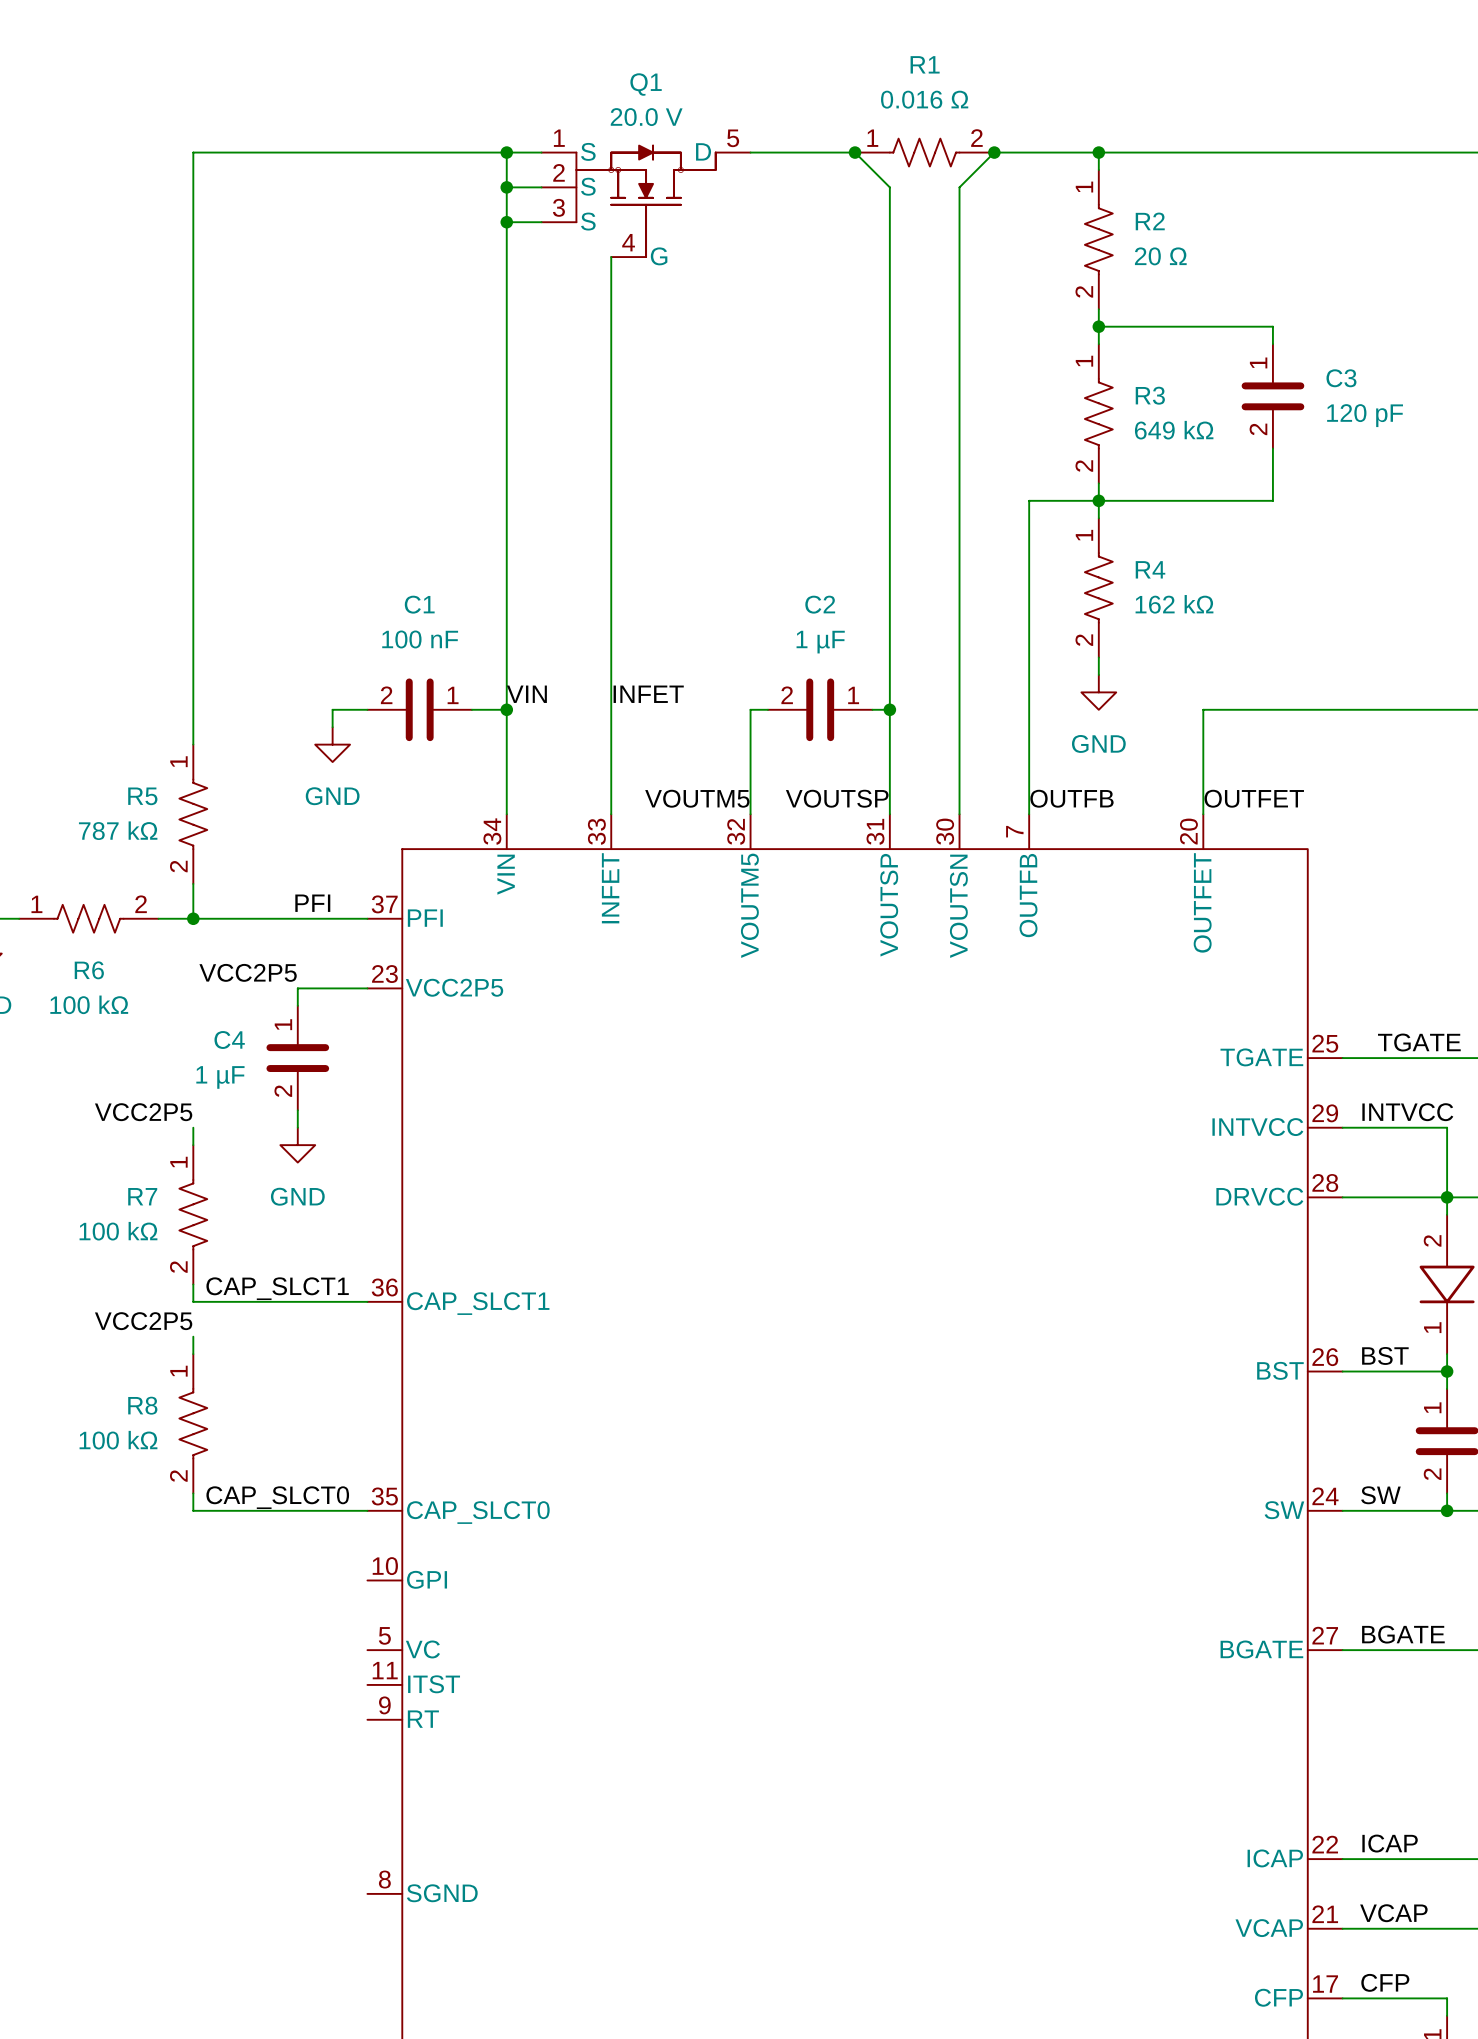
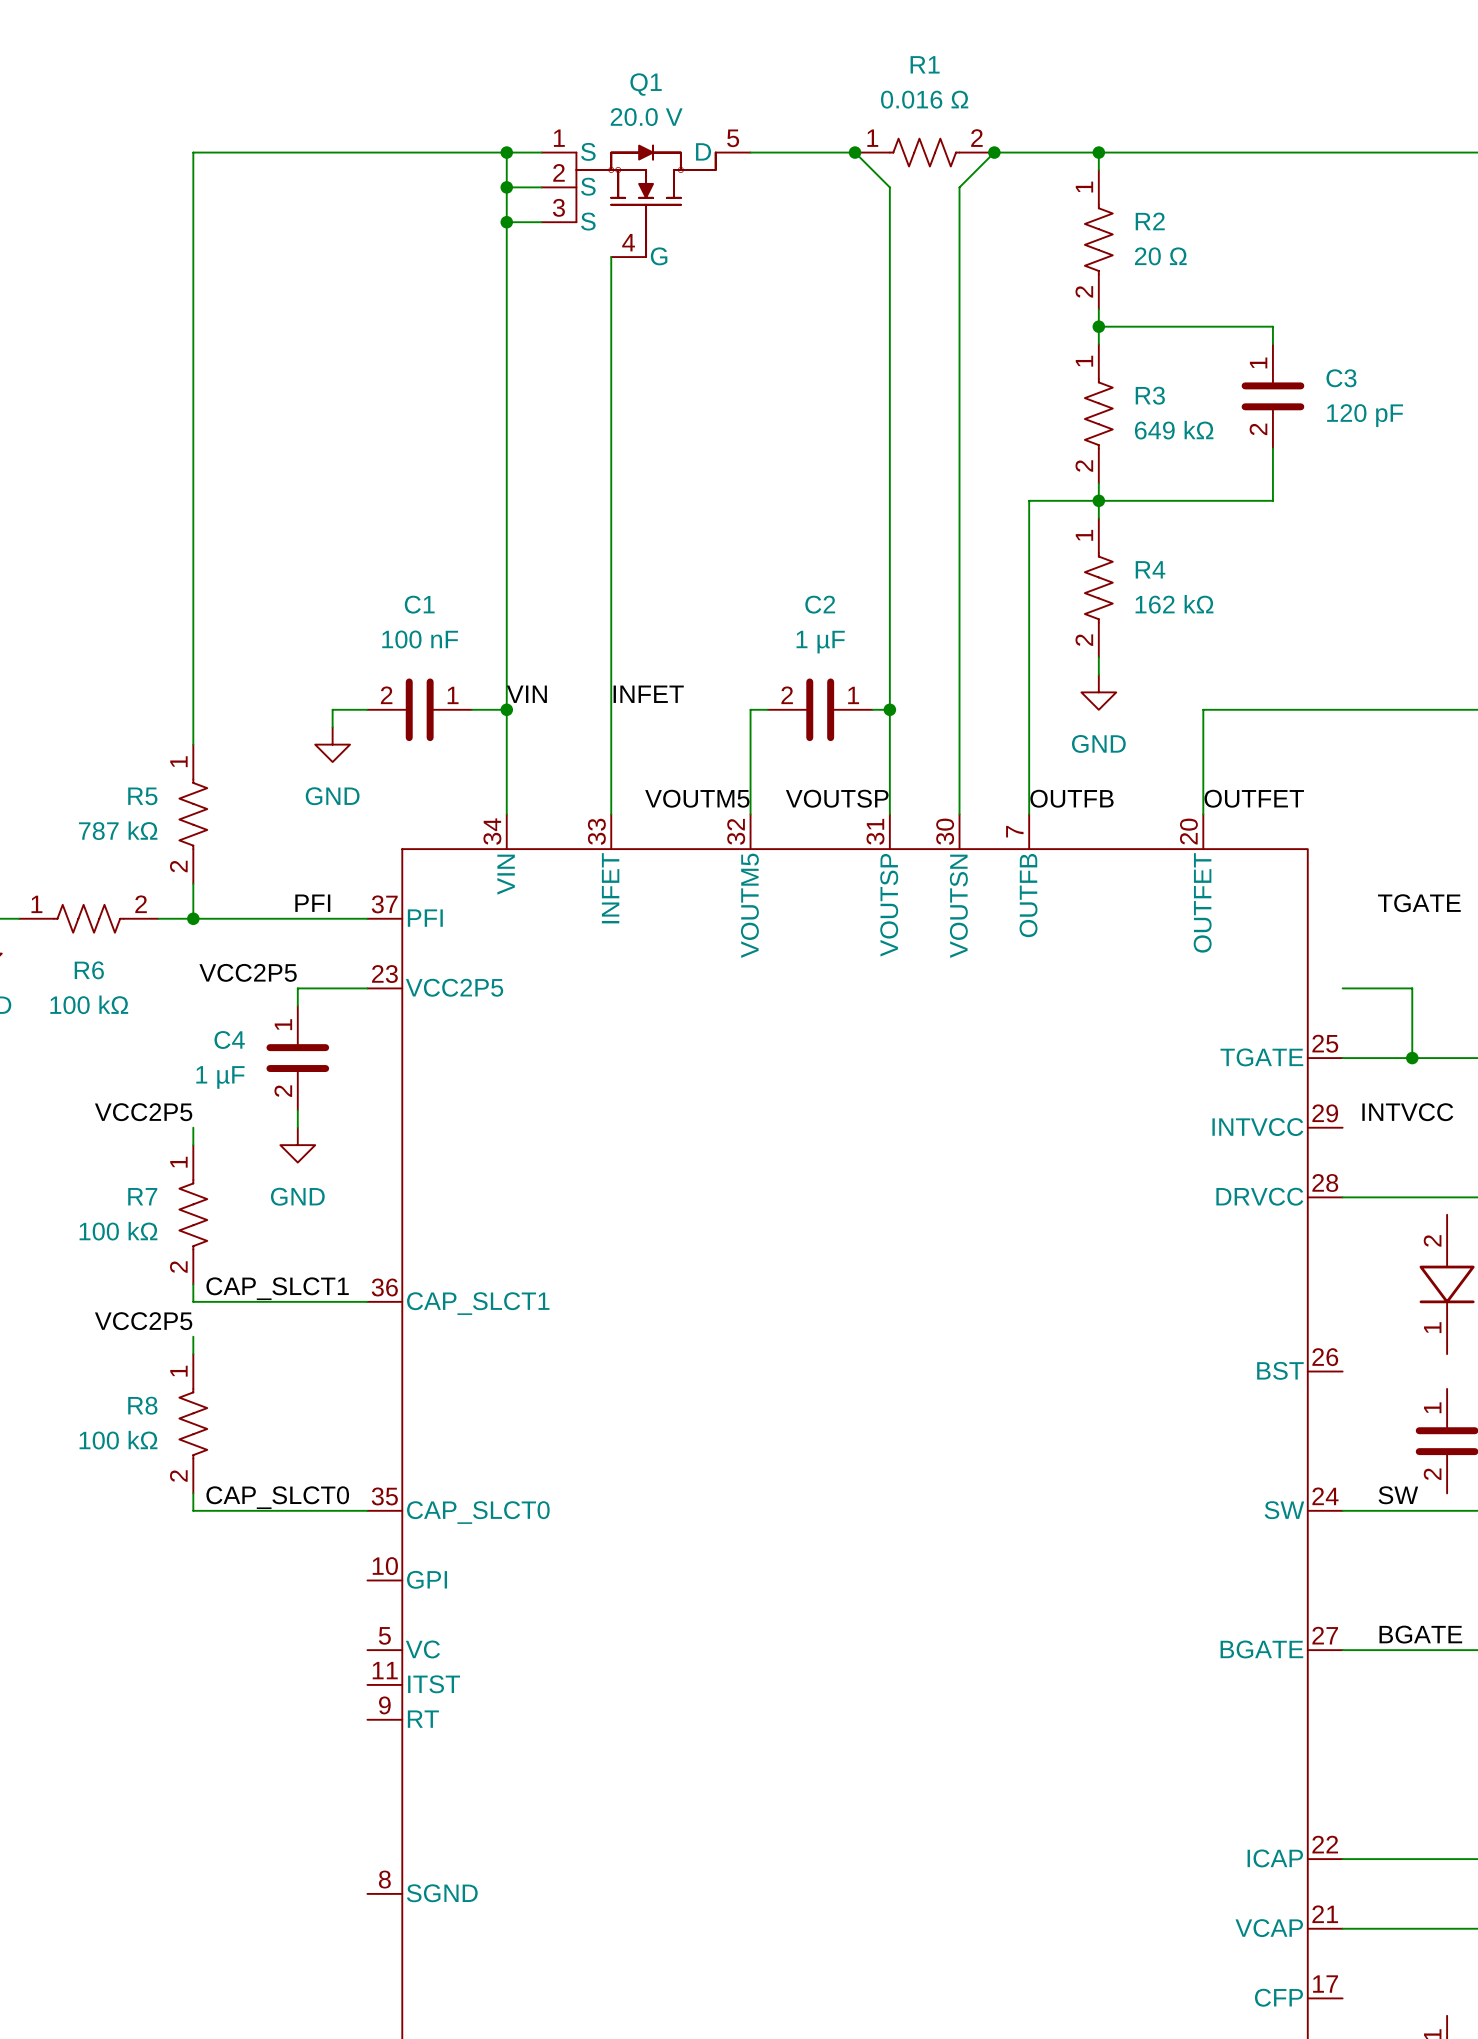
wire: none -> (1342, 988) (1412, 988) (1412, 1058)
label position: TGATE (1419, 1042) -> TGATE (1419, 903)
junction: none -> (1412, 1058)
wire: (1342, 1127) (1447, 1127) (1447, 1214) -> none
junction: (1447, 1197) -> none
wire: (1447, 1354) (1447, 1388) -> none
label: BST (1385, 1355) -> none
wire: (1342, 1371) (1447, 1371) -> none
junction: (1447, 1371) -> none
wire: (1447, 1493) (1447, 1510) -> none
label position: SW (1380, 1495) -> SW (1398, 1495)
junction: (1447, 1510) -> none
label position: BGATE (1403, 1634) -> BGATE (1420, 1634)
label: ICAP (1390, 1843) -> none
label: VCAP (1393, 1913) -> none
label: CFP (1385, 1982) -> none
wire: (1342, 1998) (1447, 1998) (1447, 2015) -> none

